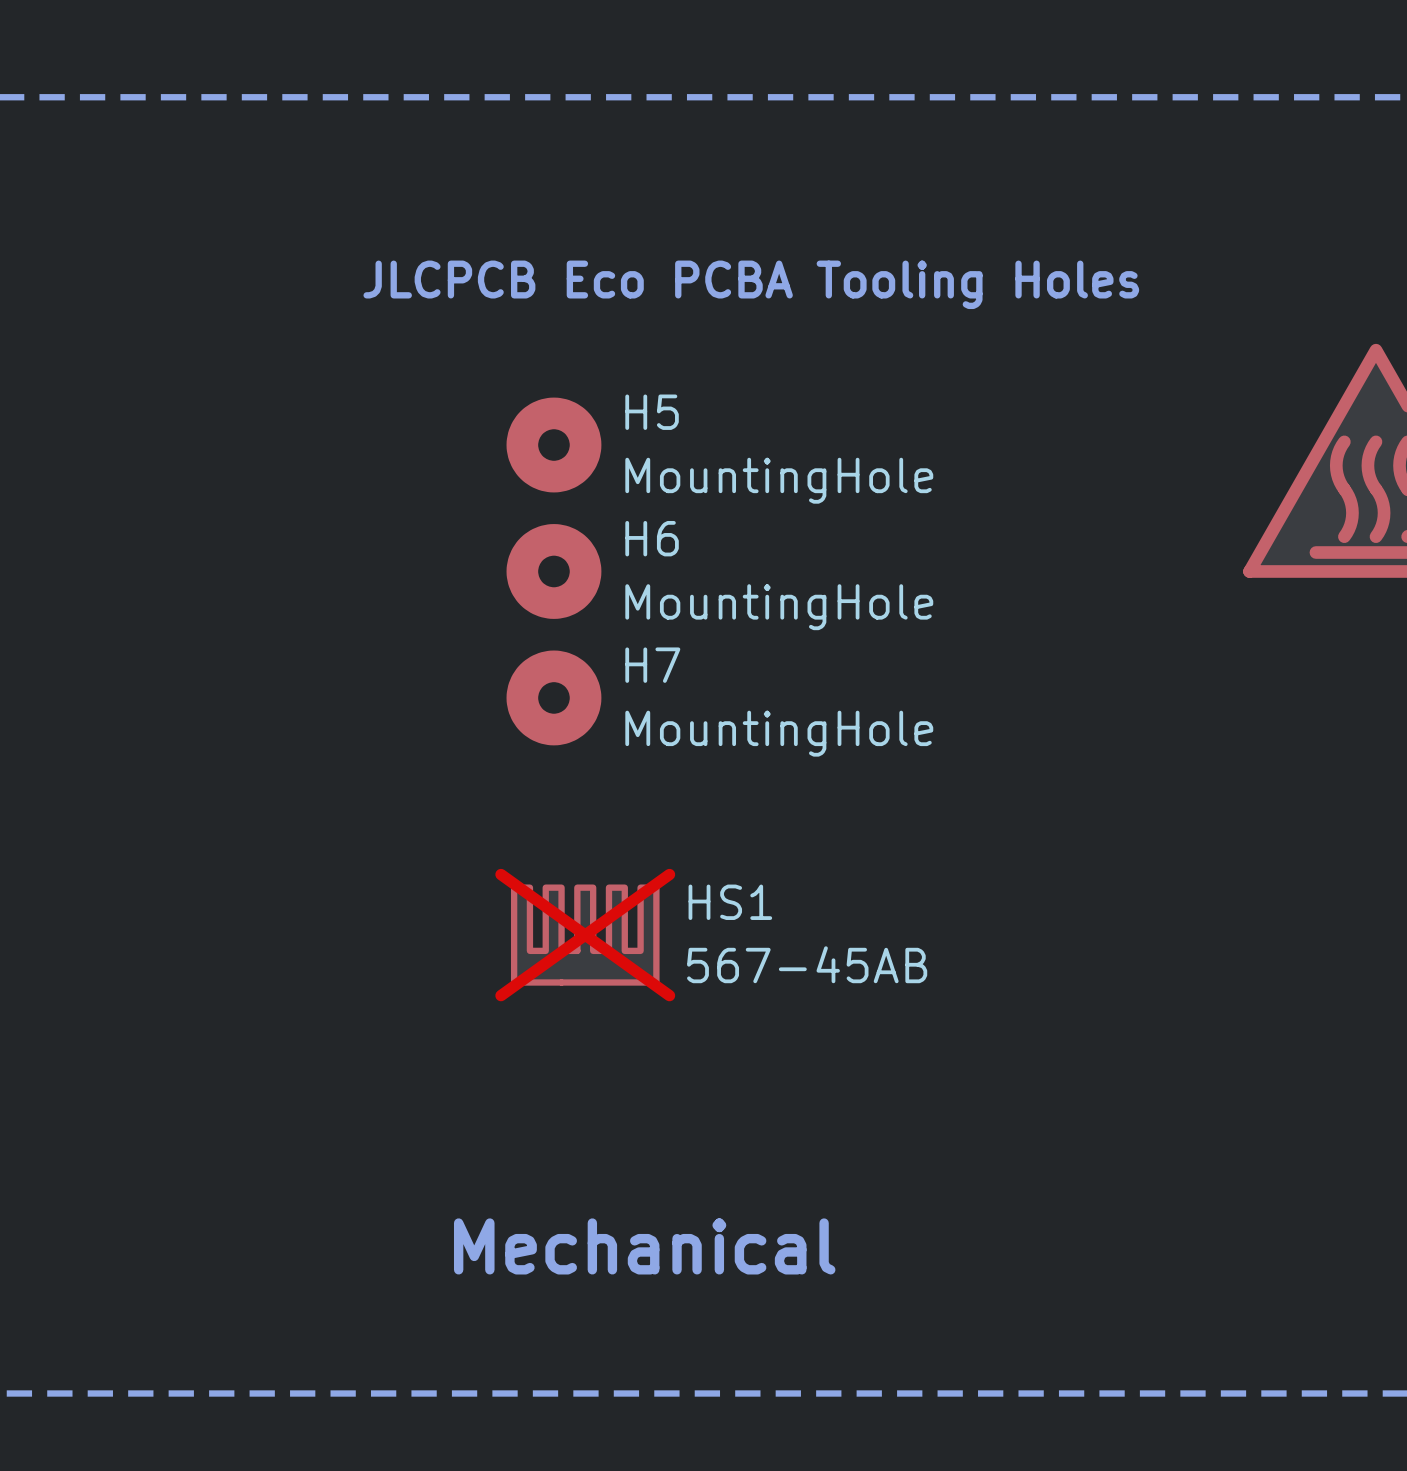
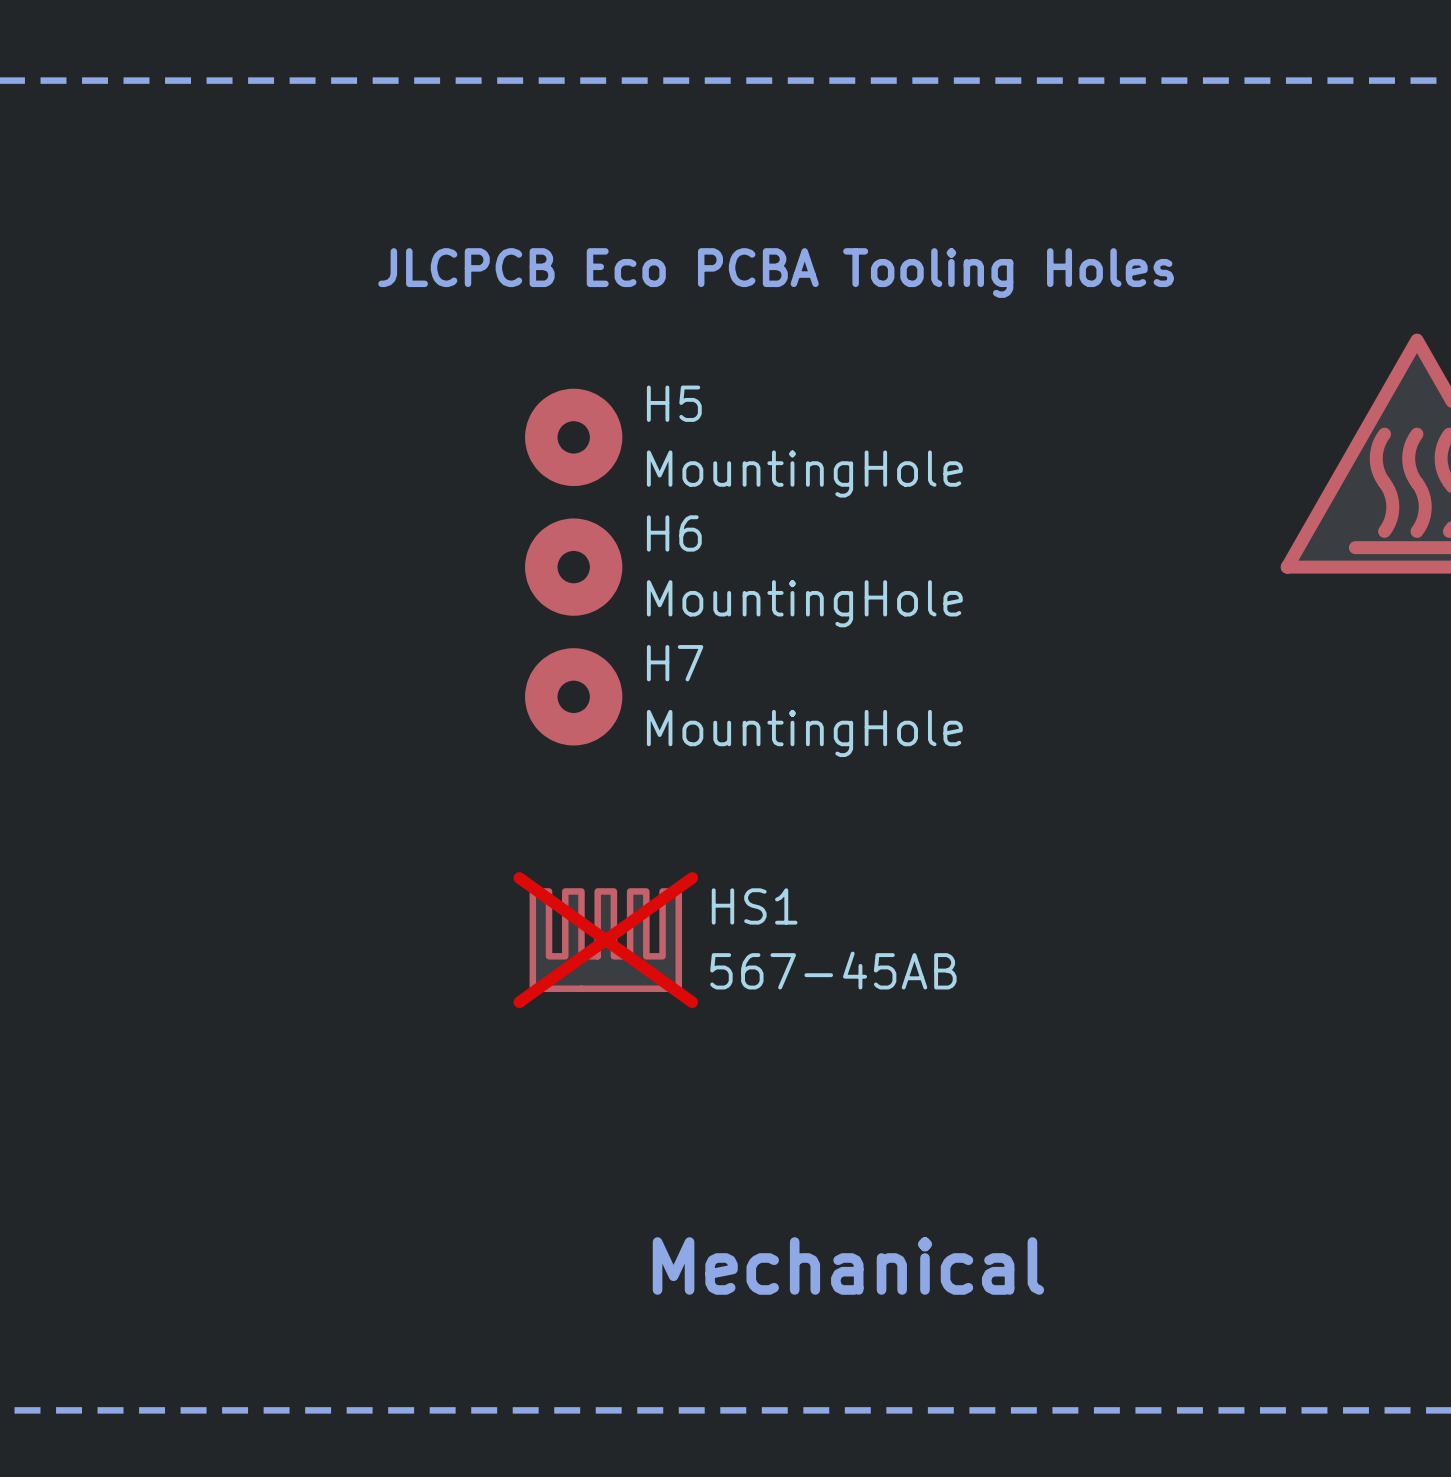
text position: Mechanical (644, 1246) -> Mechanical (848, 1265)

